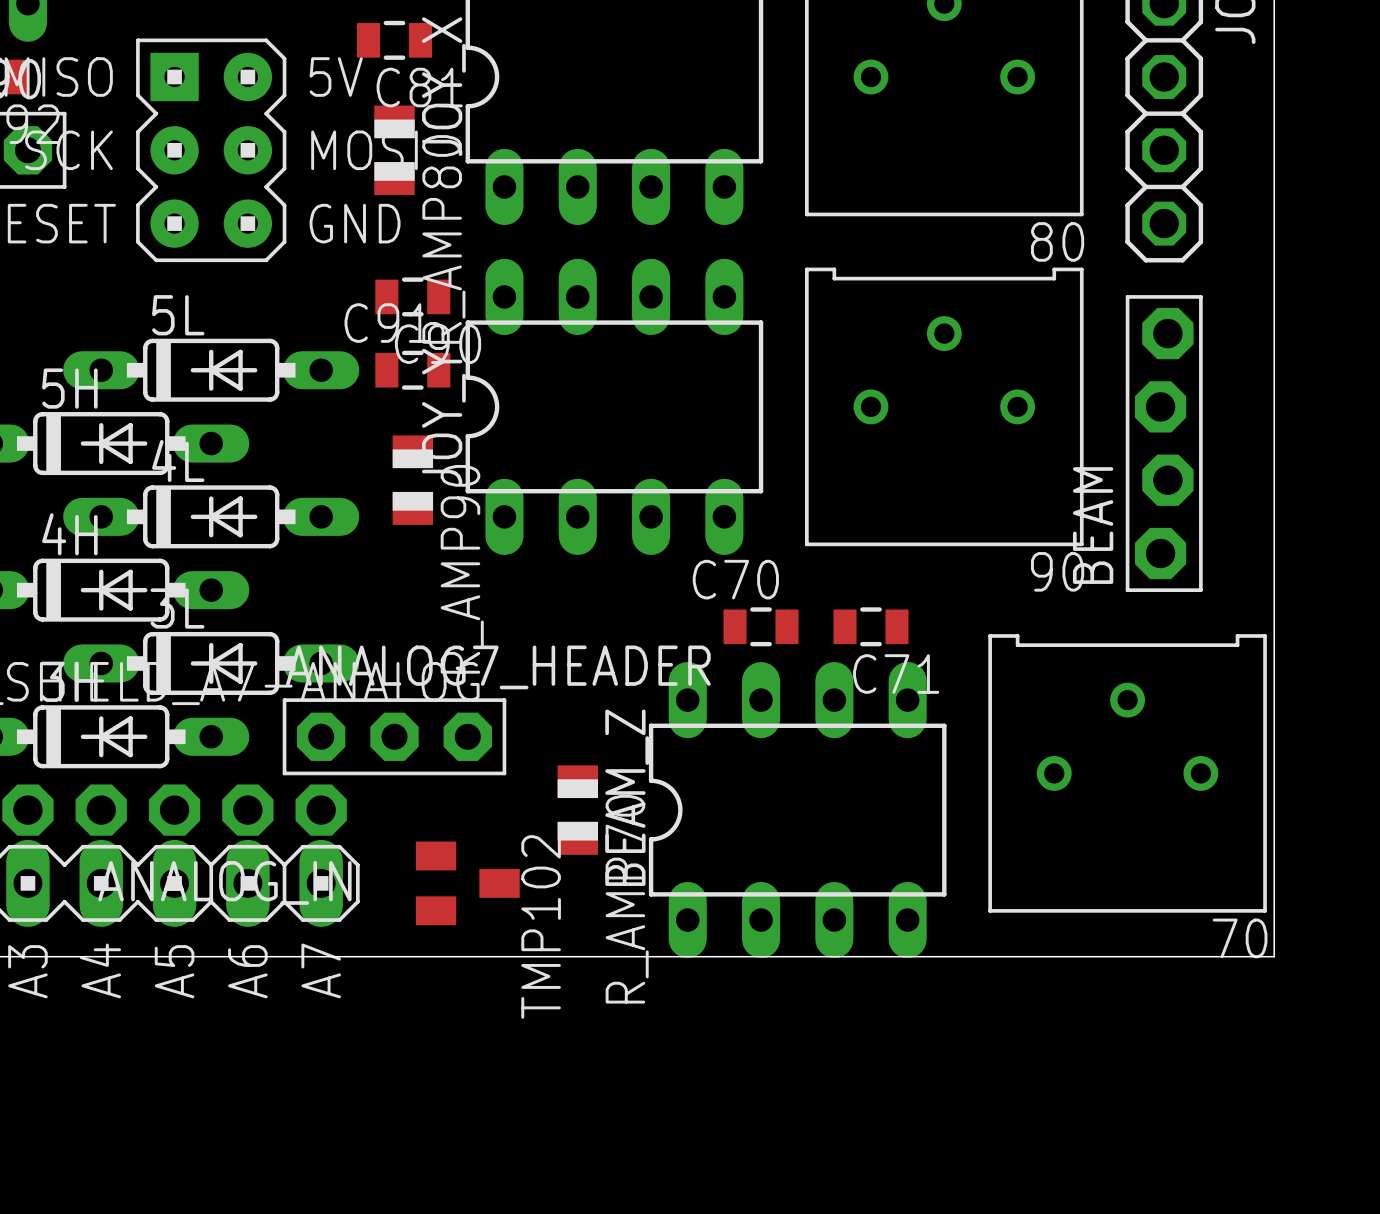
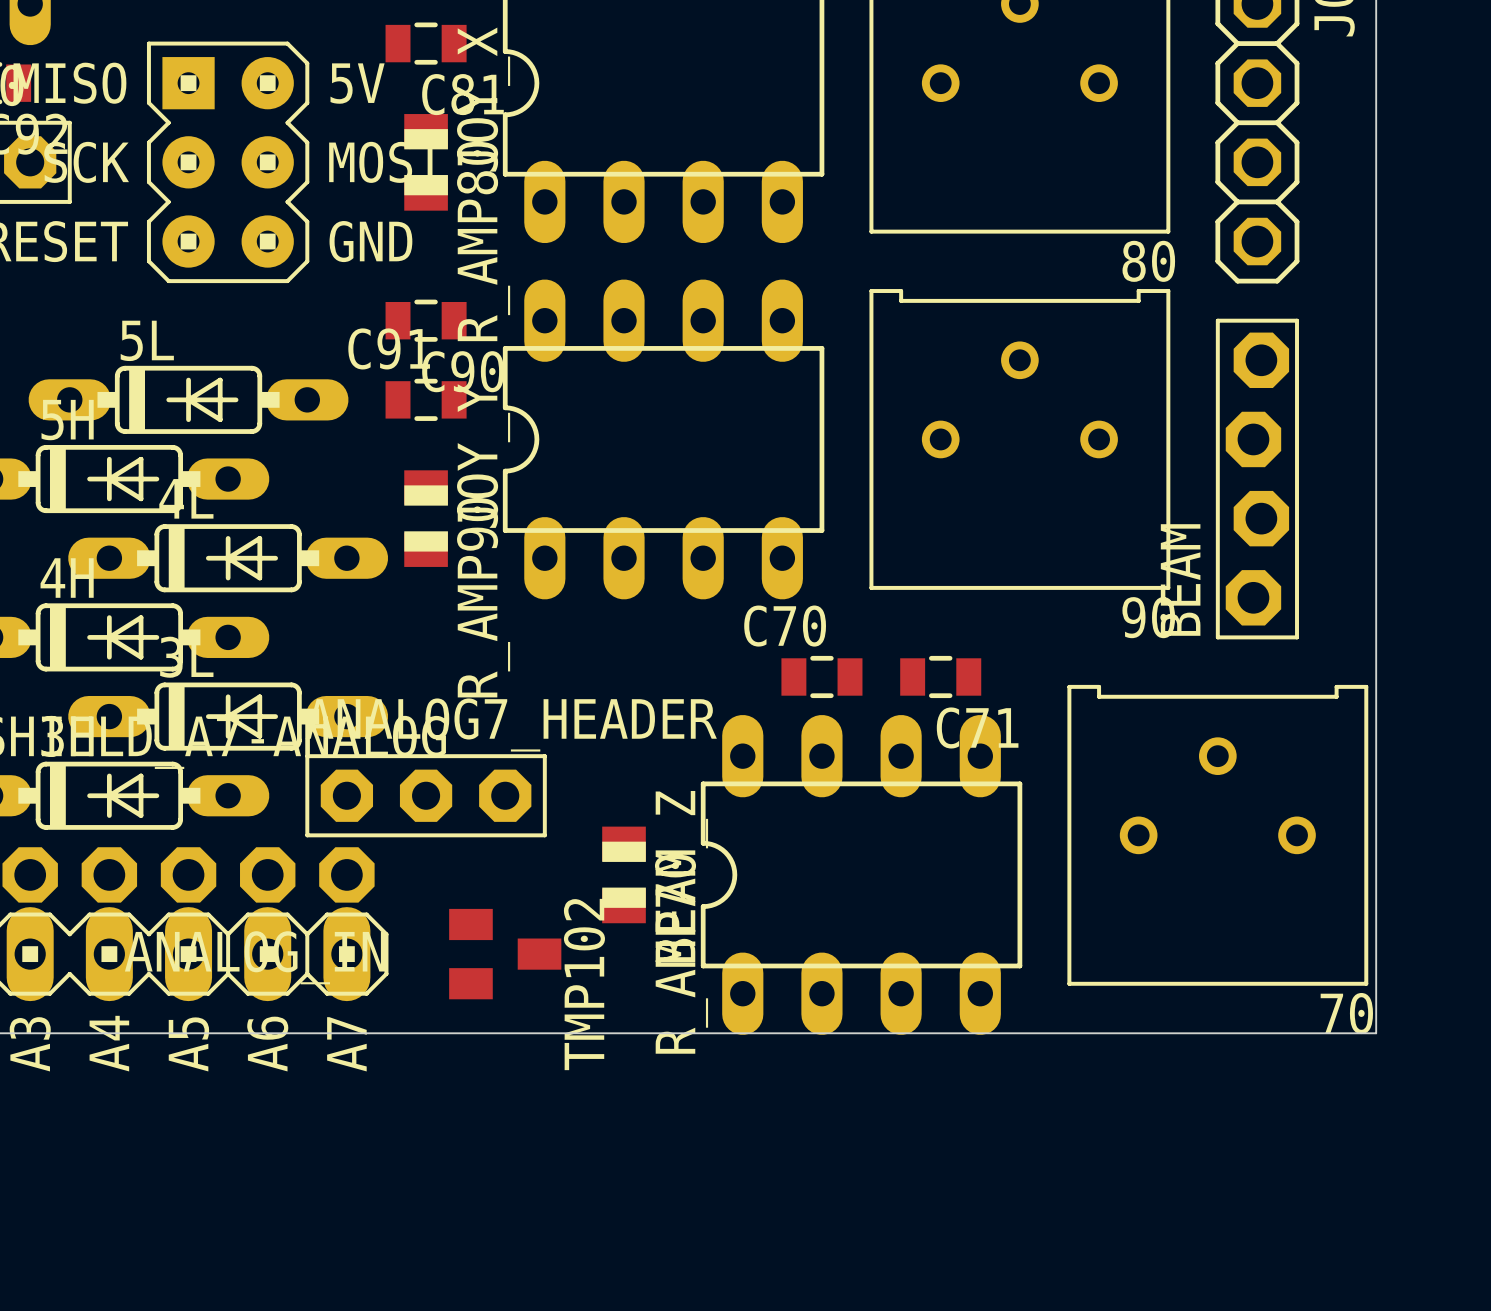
C90 position: (412, 296) -> (426, 320)
5L position: (211, 370) -> (188, 399)
C91 position: (412, 370) -> (426, 399)
R_AMP90 position: (412, 480) -> (426, 518)

